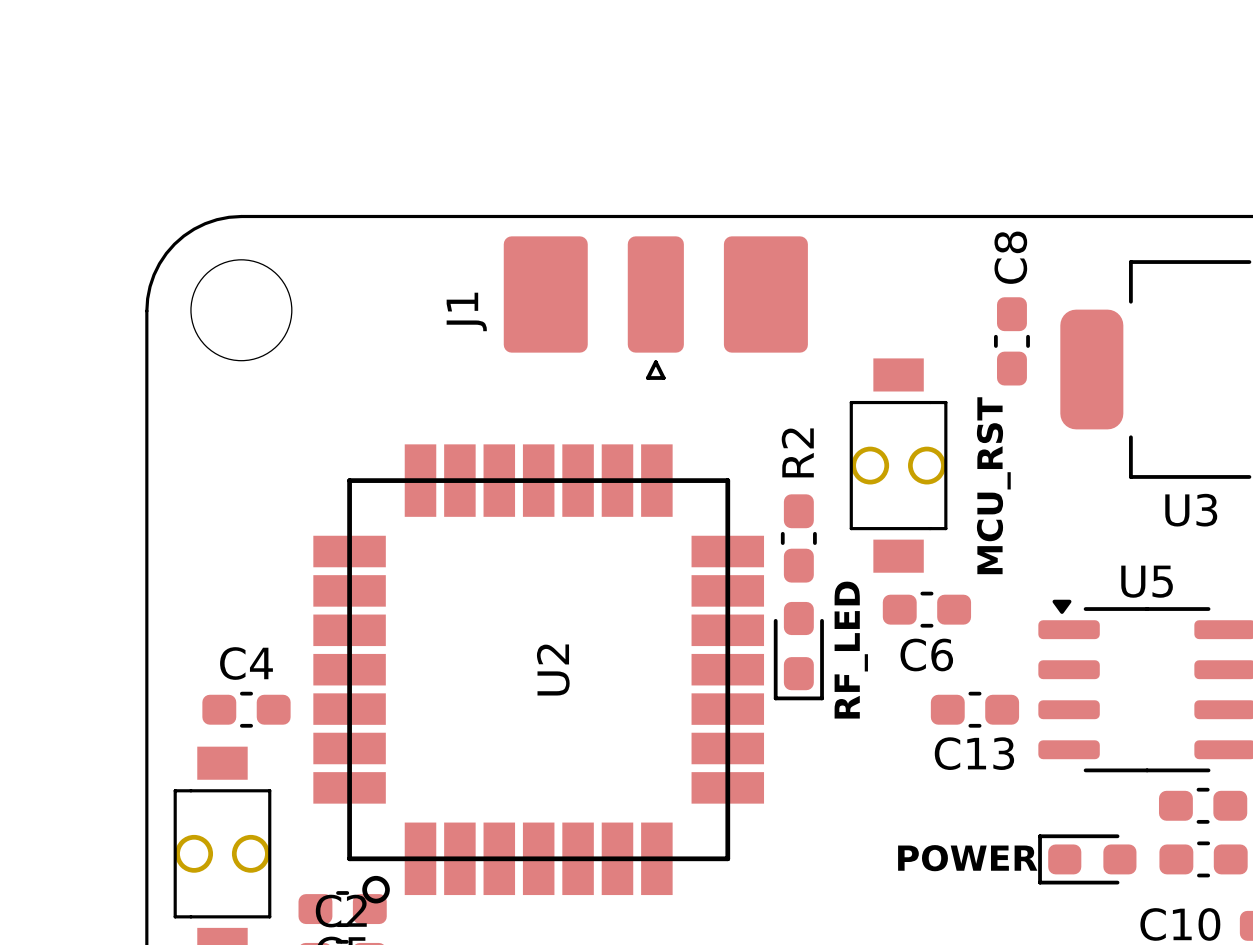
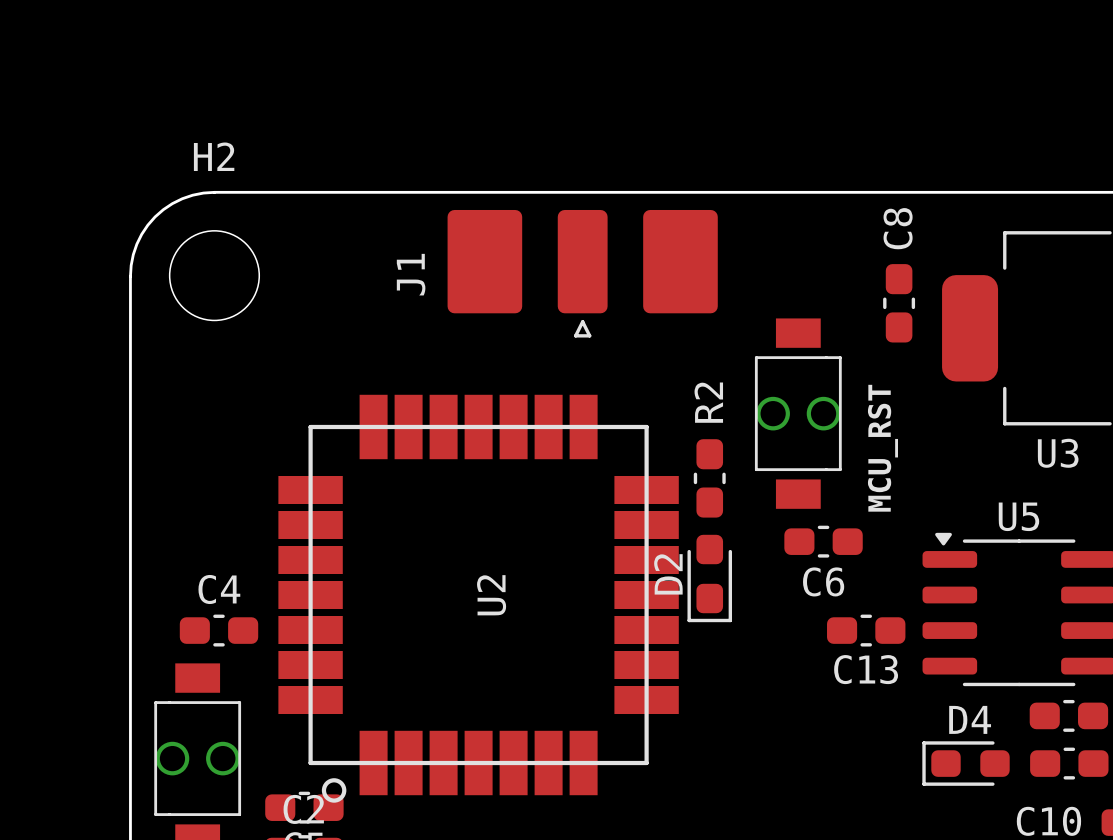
H2 name: none -> H2 (214, 156)
D2 name: none -> D2 (668, 574)
text: RF_LED (851, 650) -> none
D4 name: none -> D4 (970, 719)
text: POWER (967, 858) -> none

